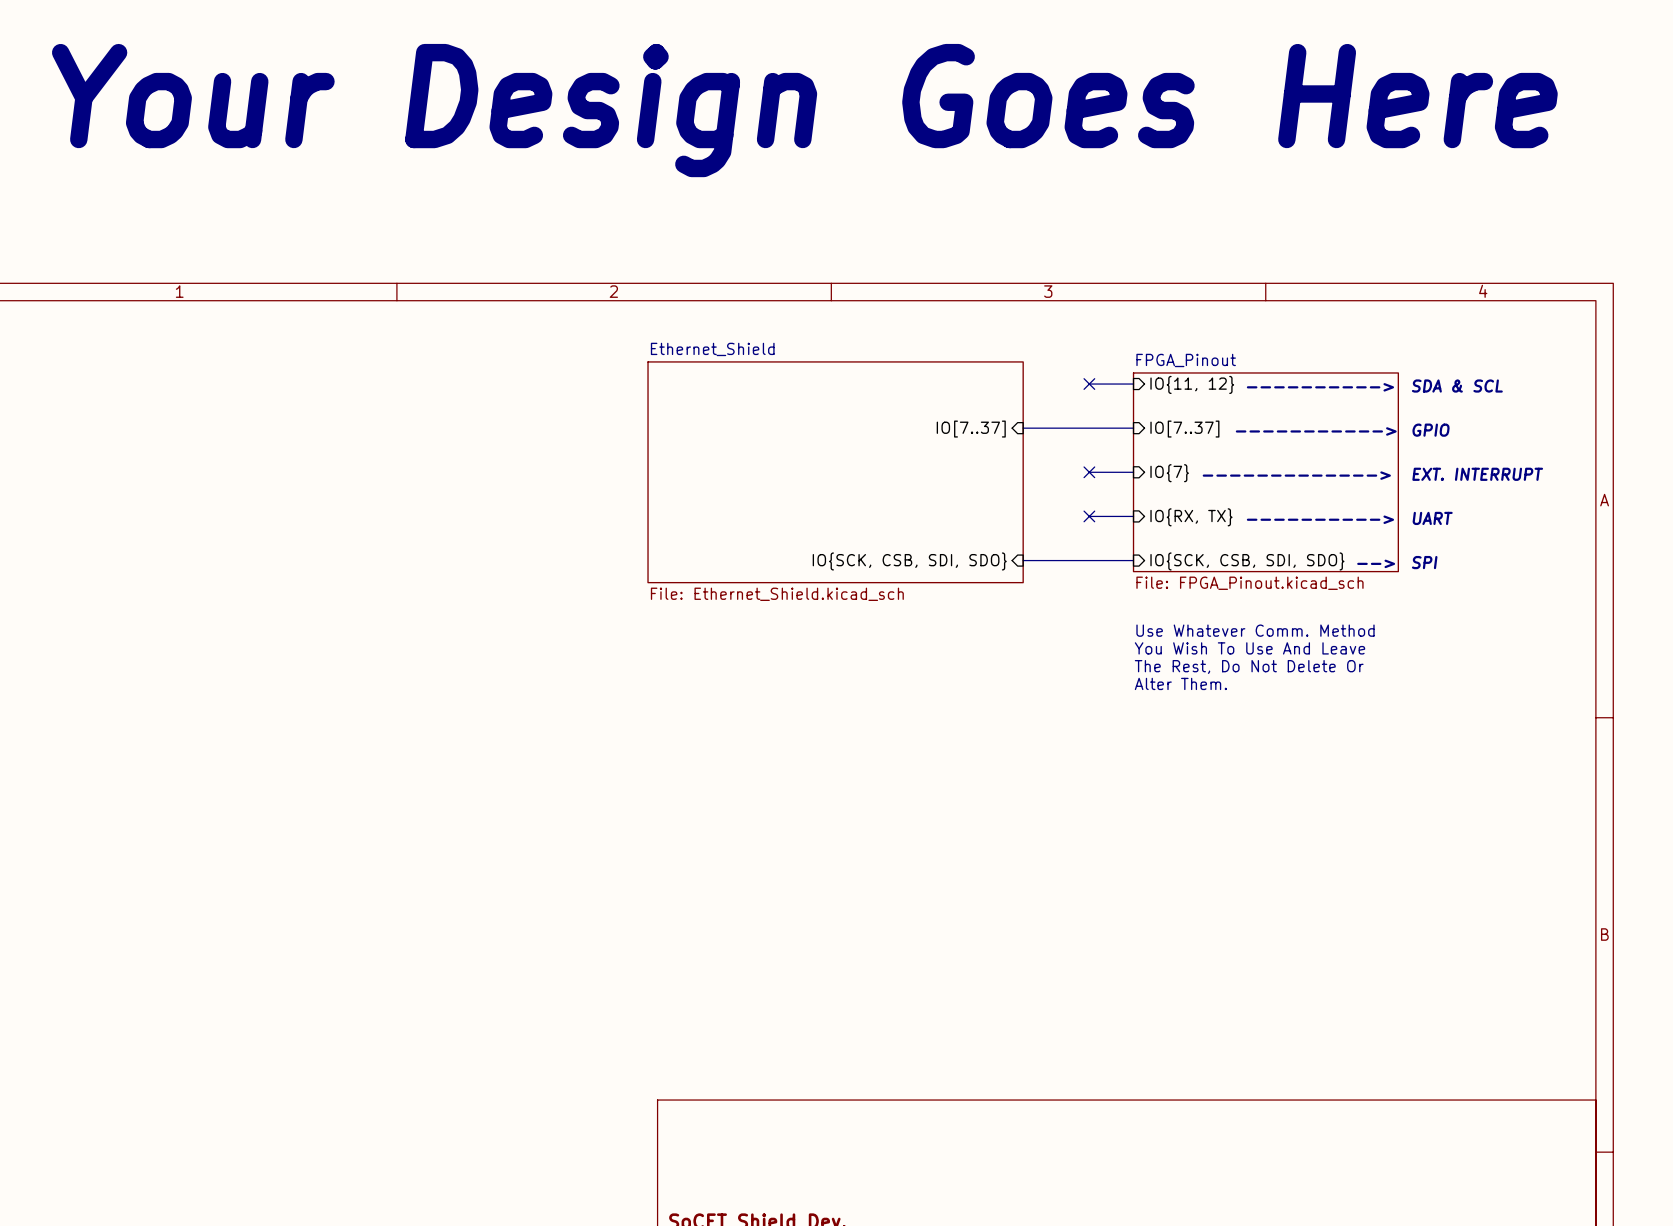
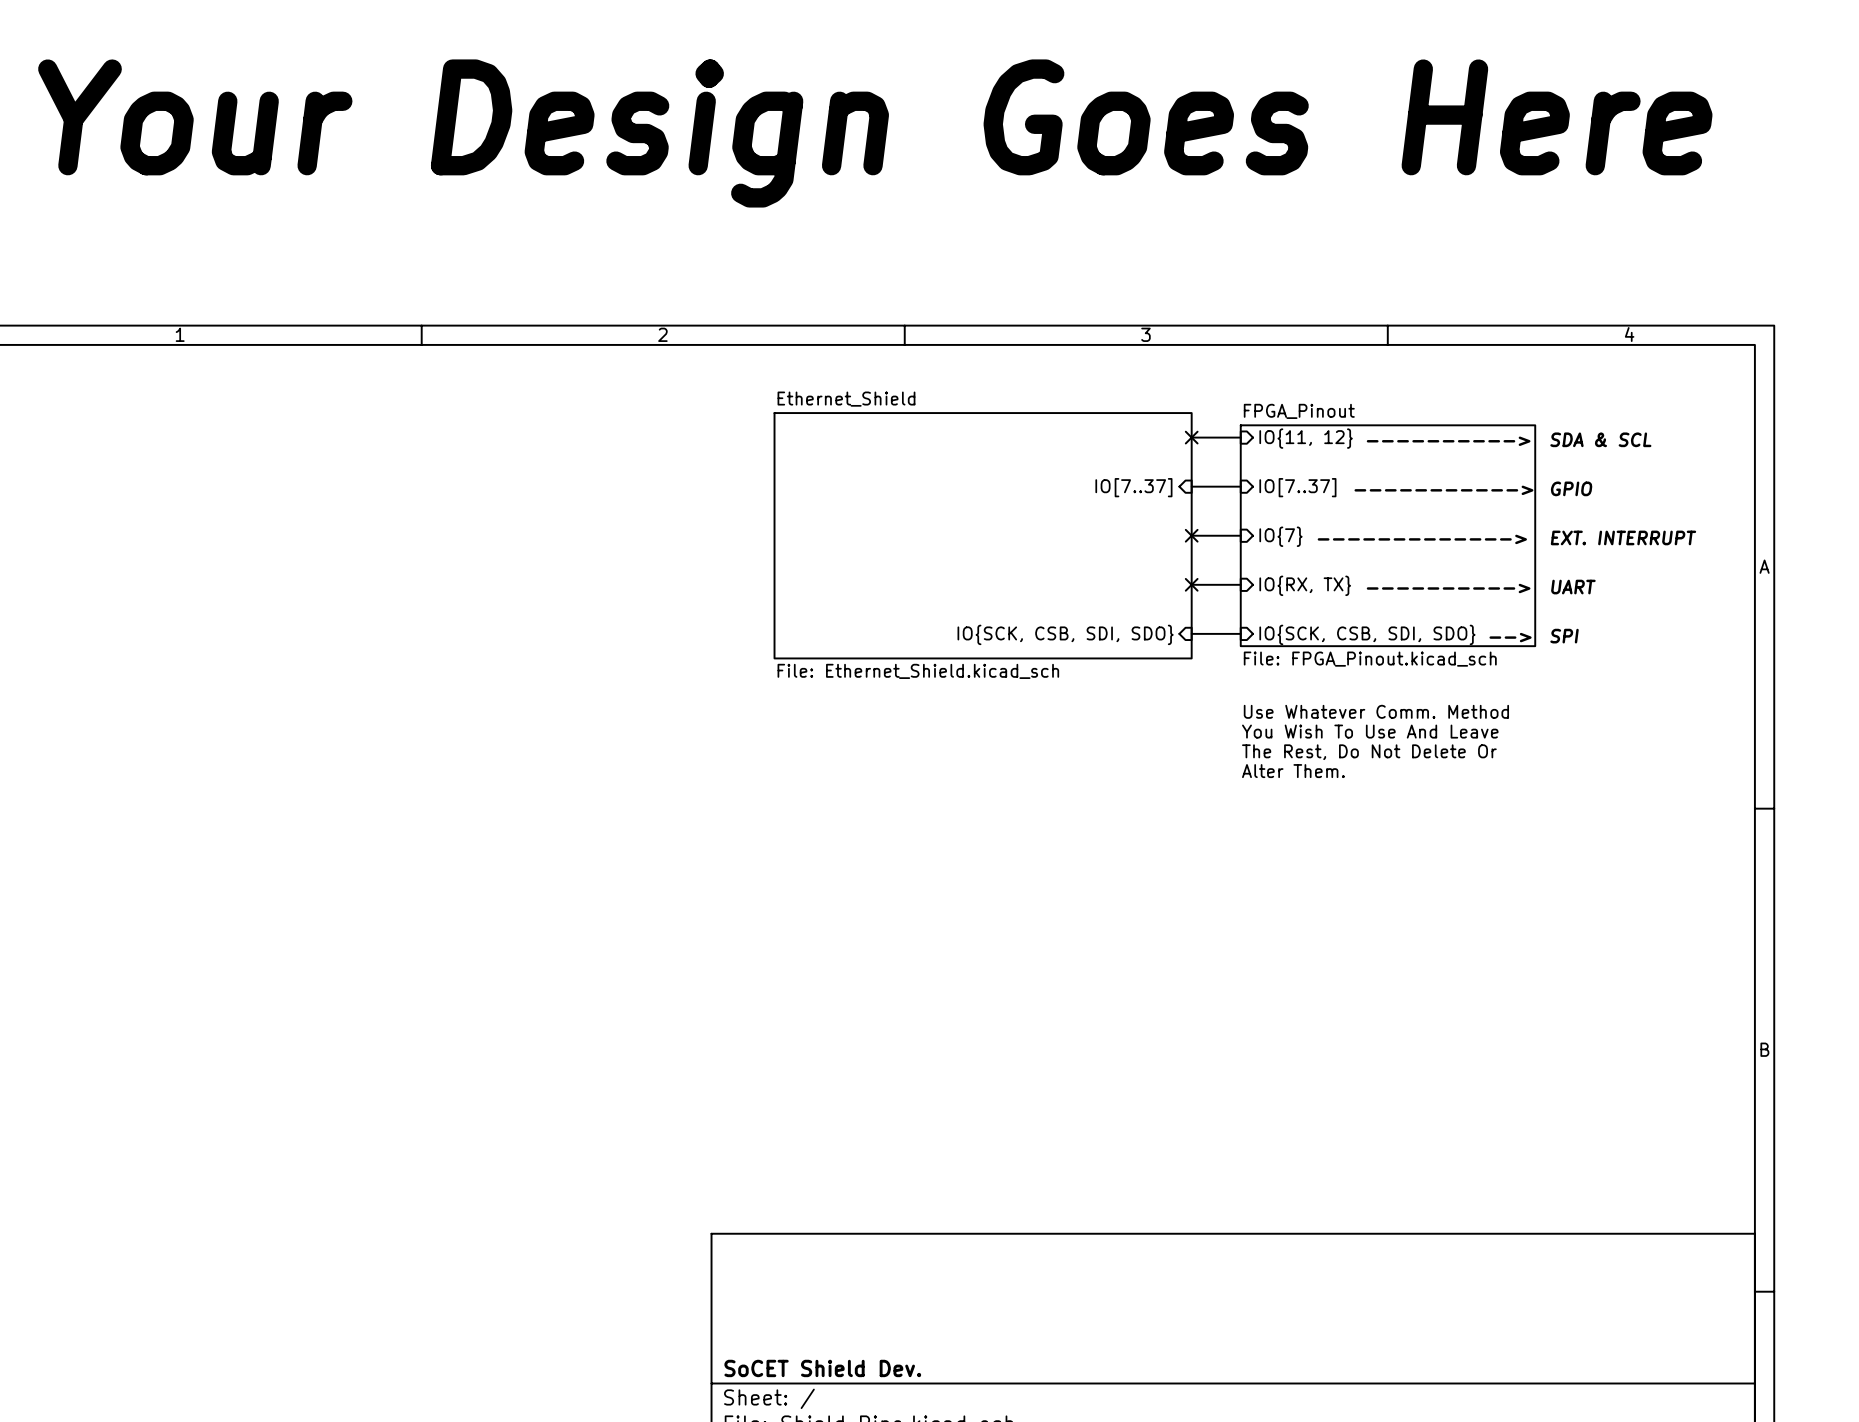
bus: (1023, 428) (1089, 428) -> none
sheet pin position: IO[7..37] (971, 429) -> IO[7..37] (1133, 487)
sheet Ethernet_Shield position: (835, 472) -> (983, 535)
bus: (1023, 560) (1089, 560) -> none
sheet pin position: IO{SCK, CSB, SDI, SDO} (909, 561) -> IO{SCK, CSB, SDI, SDO} (1065, 634)

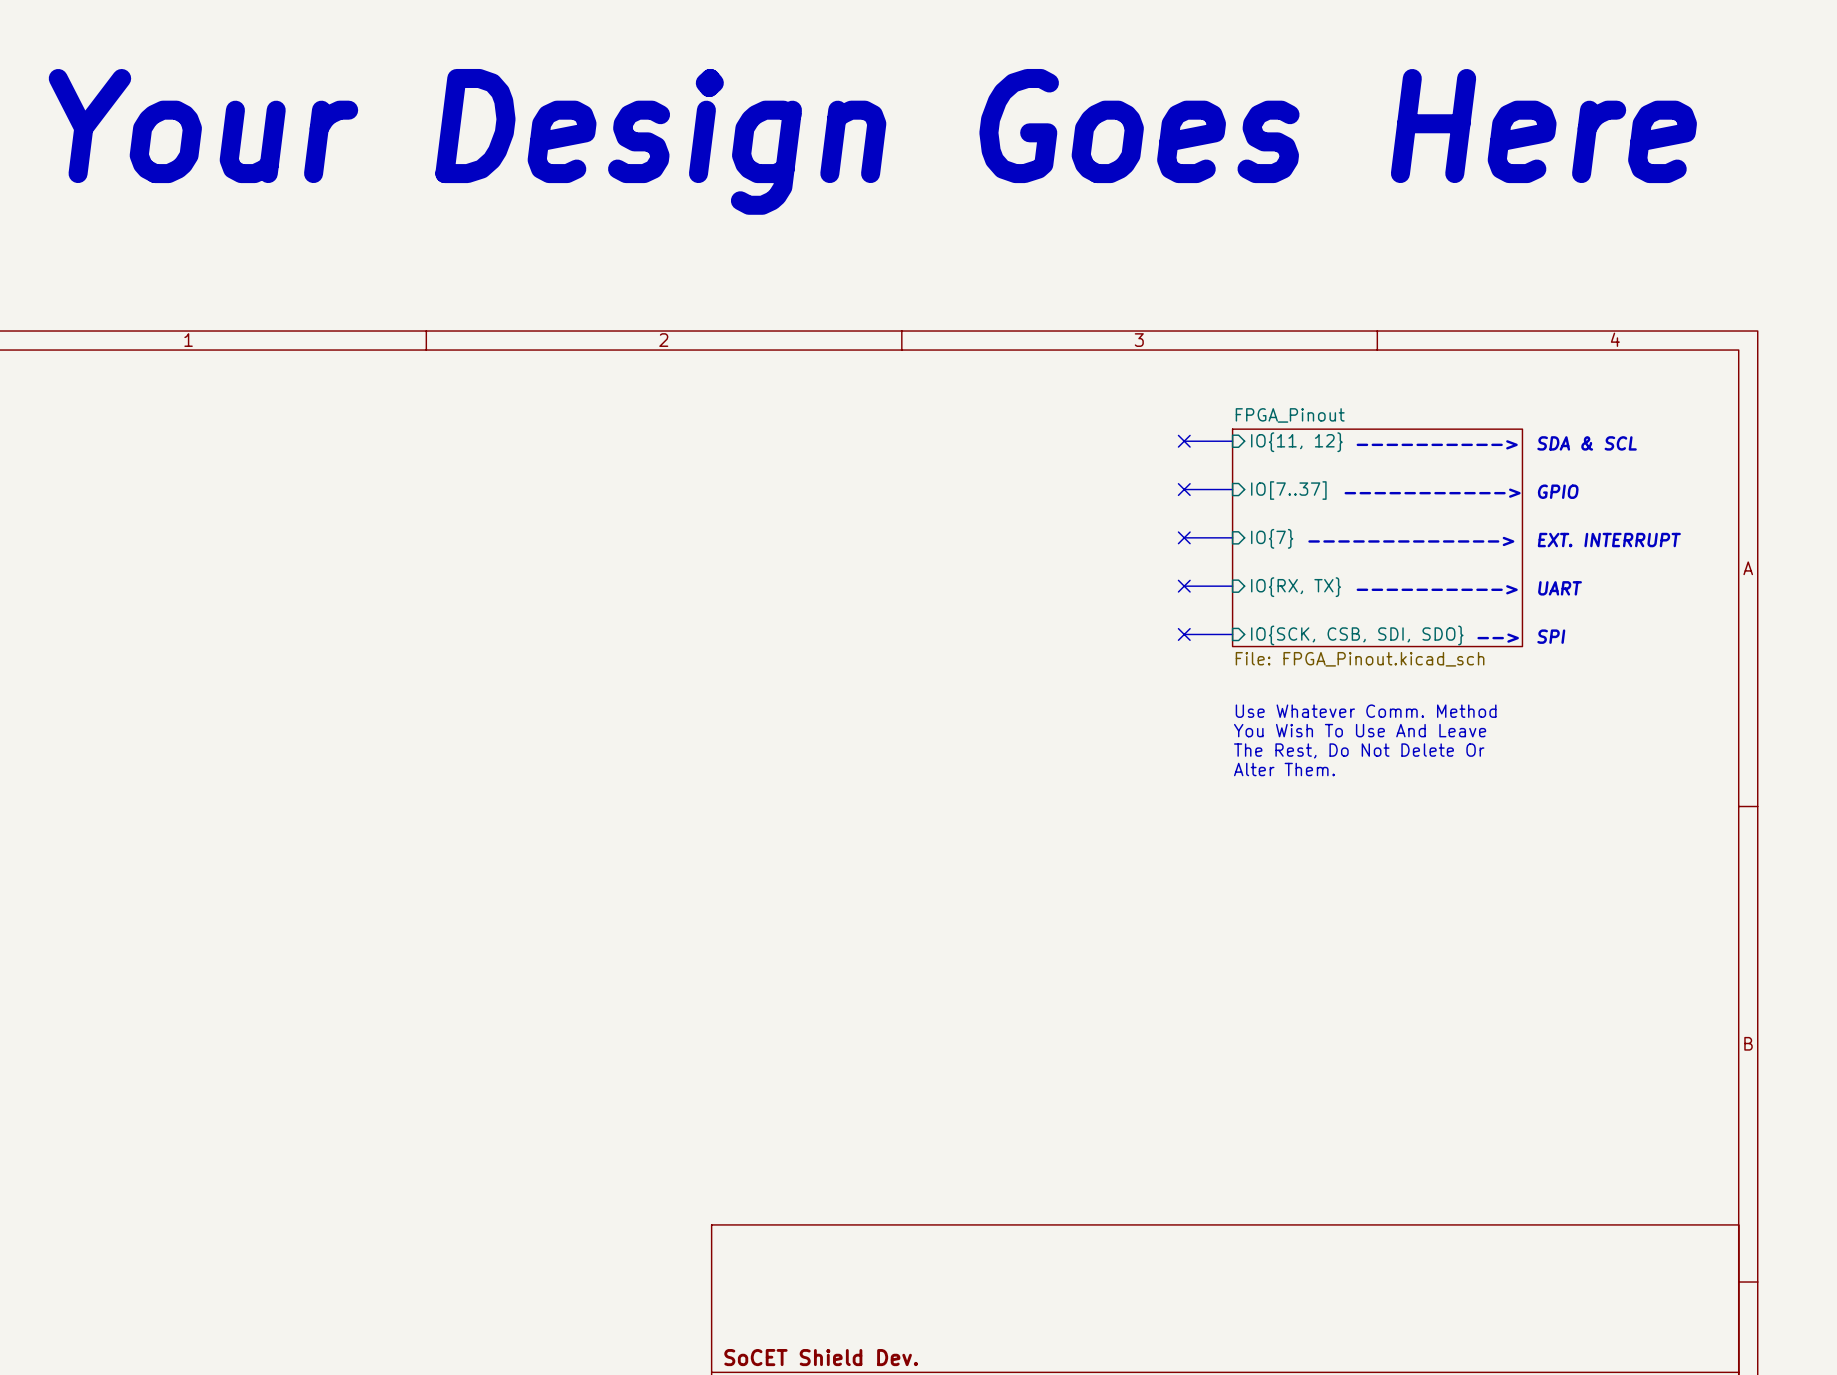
no-connect mark: none -> (1184, 489)
sheet pin: IO[7..37] (1133, 487) -> none
sheet Ethernet_Shield: File: Ethernet_Shield.kicad_sch (983, 535) -> none
no-connect mark: none -> (1184, 634)
sheet pin: IO{SCK, CSB, SDI, SDO} (1065, 634) -> none

